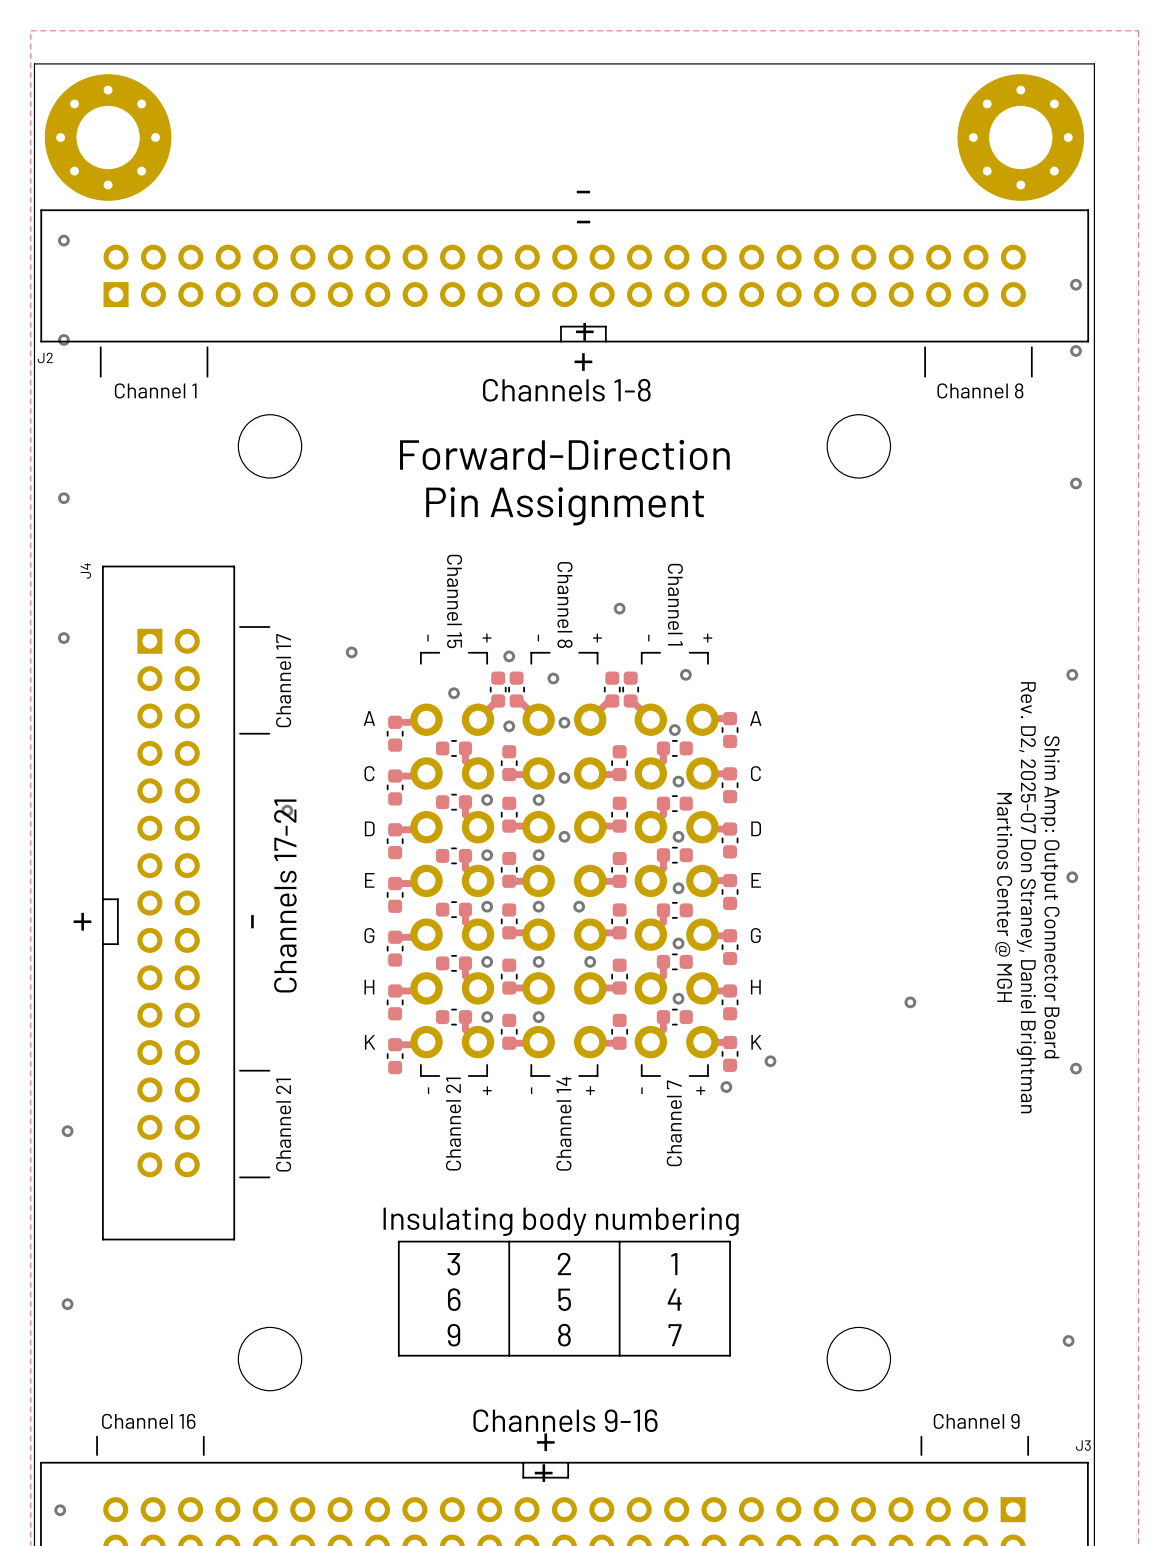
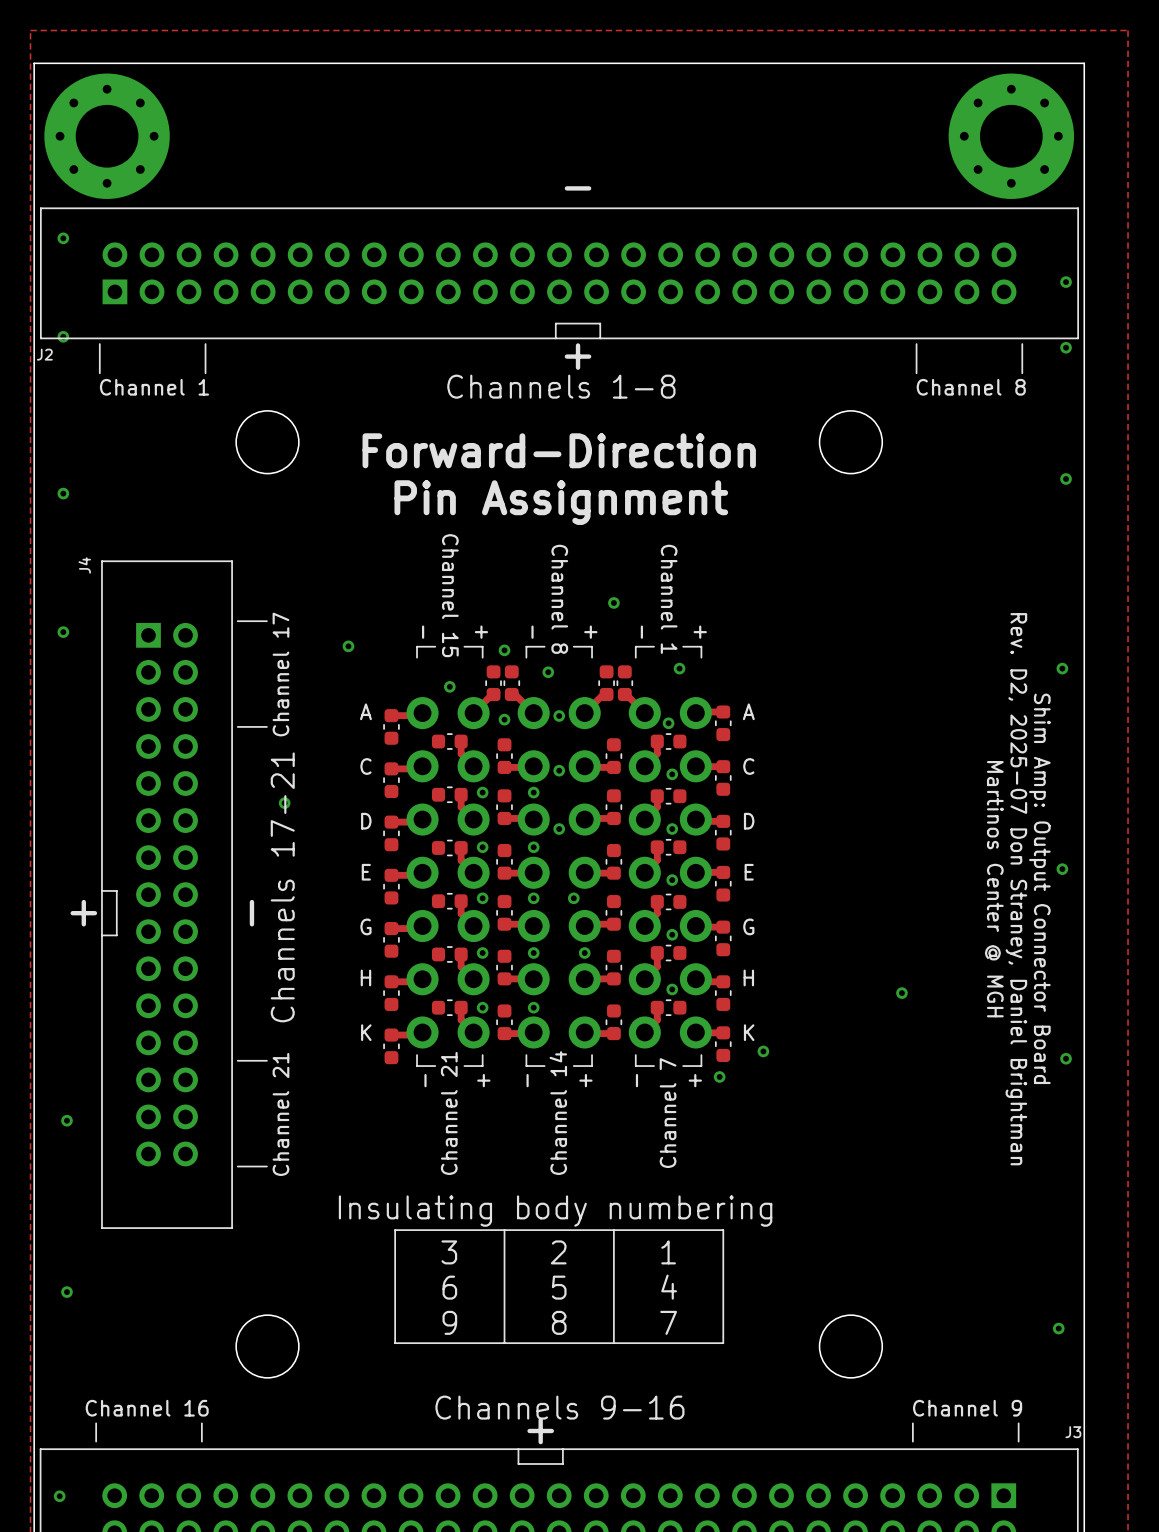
text rotation: 0° (583, 222) -> 180° (578, 188)
text: + (584, 331) -> none
text: + (543, 1473) -> none

